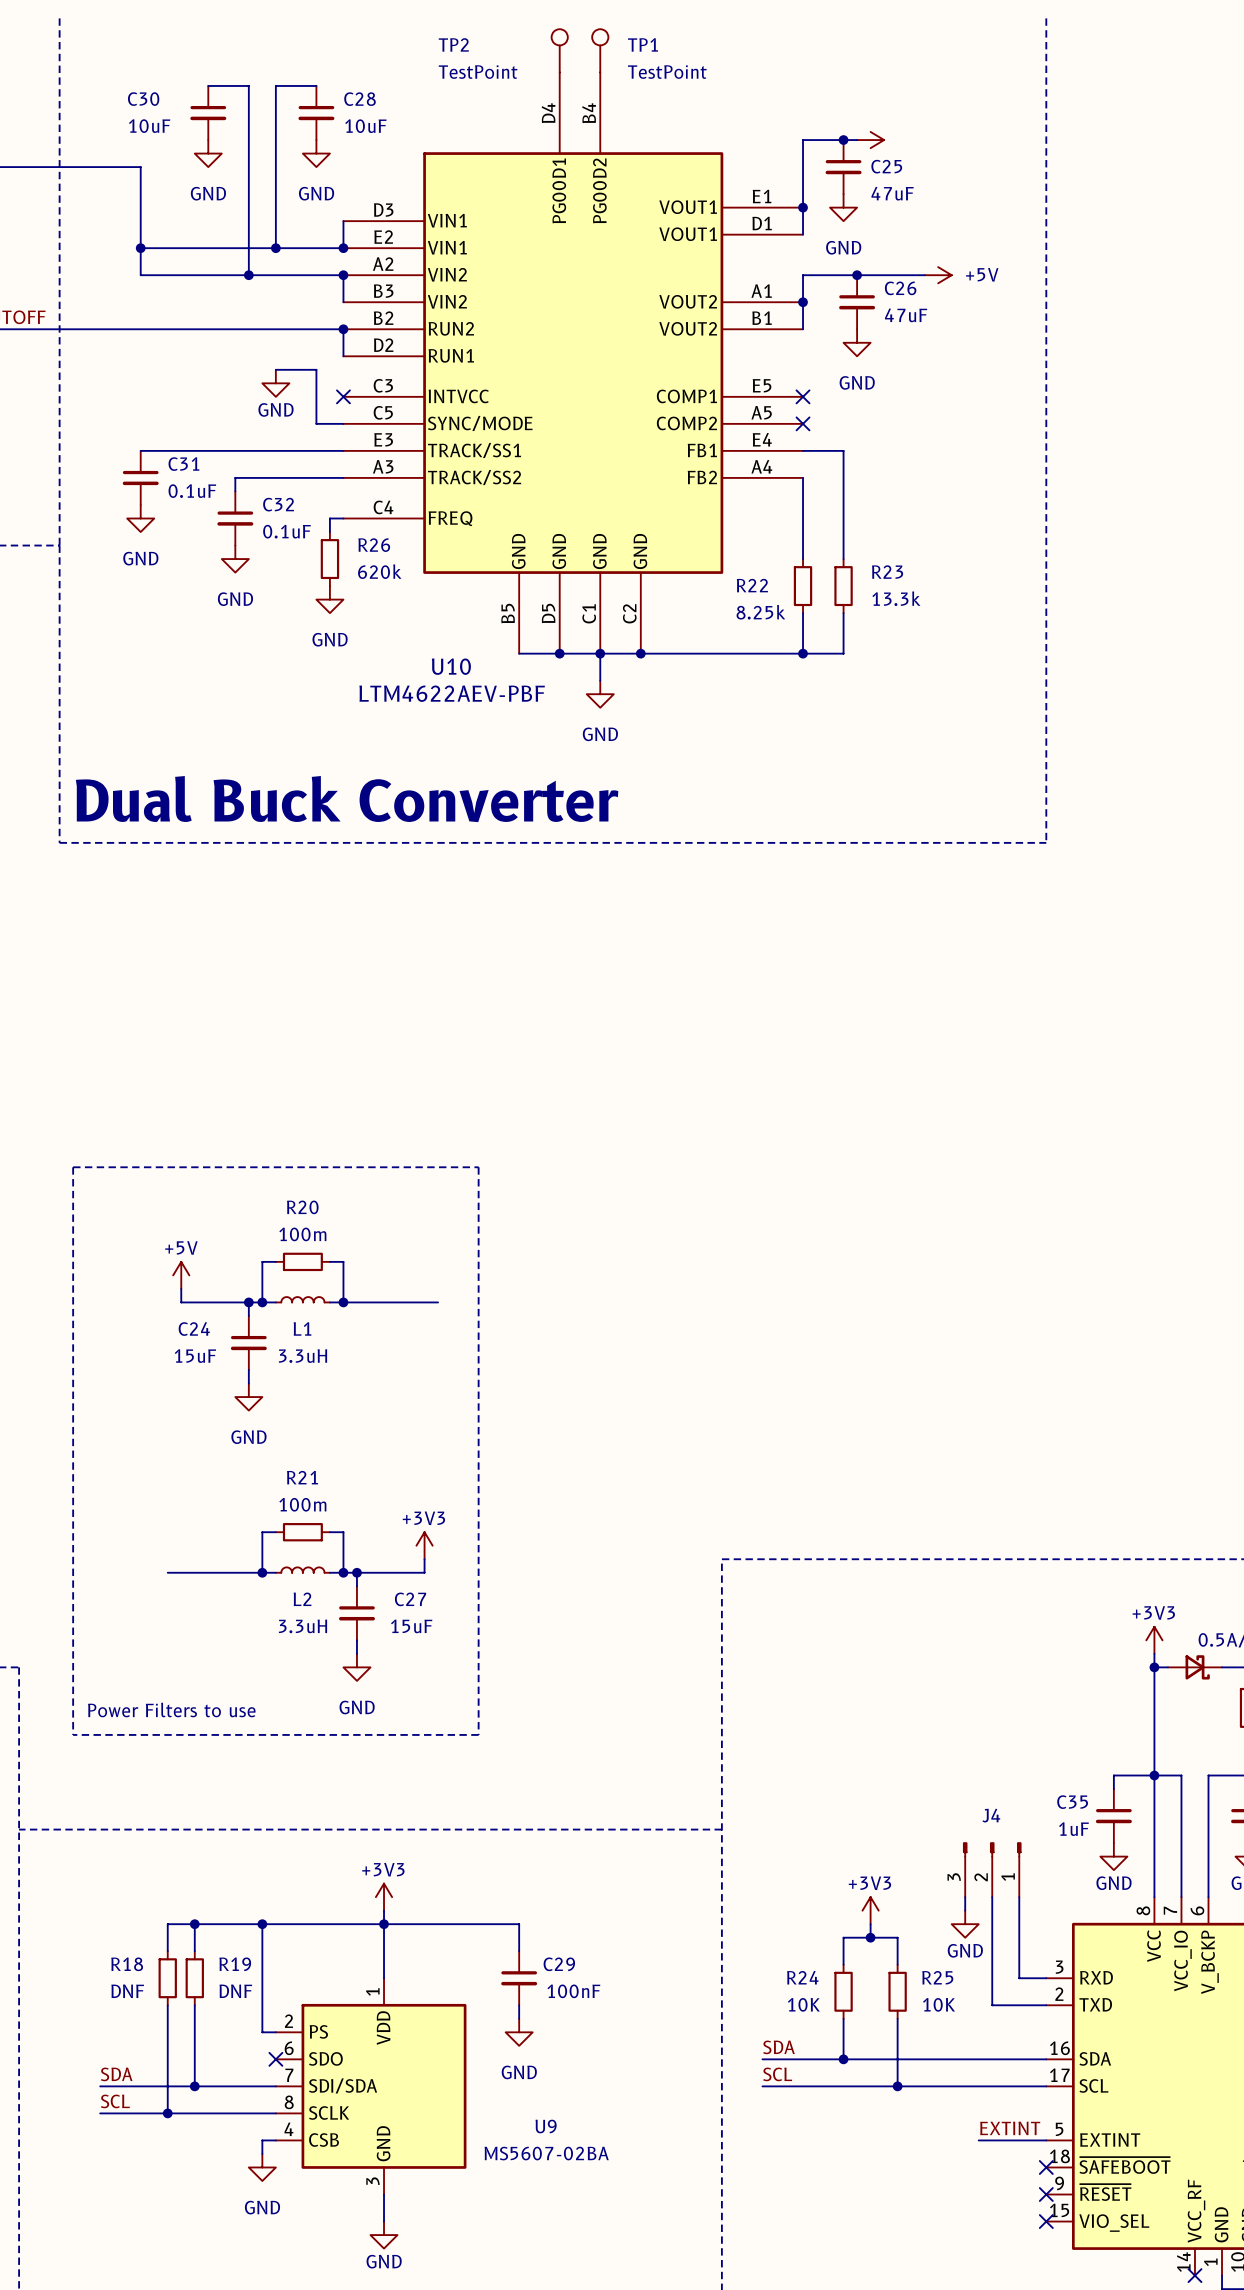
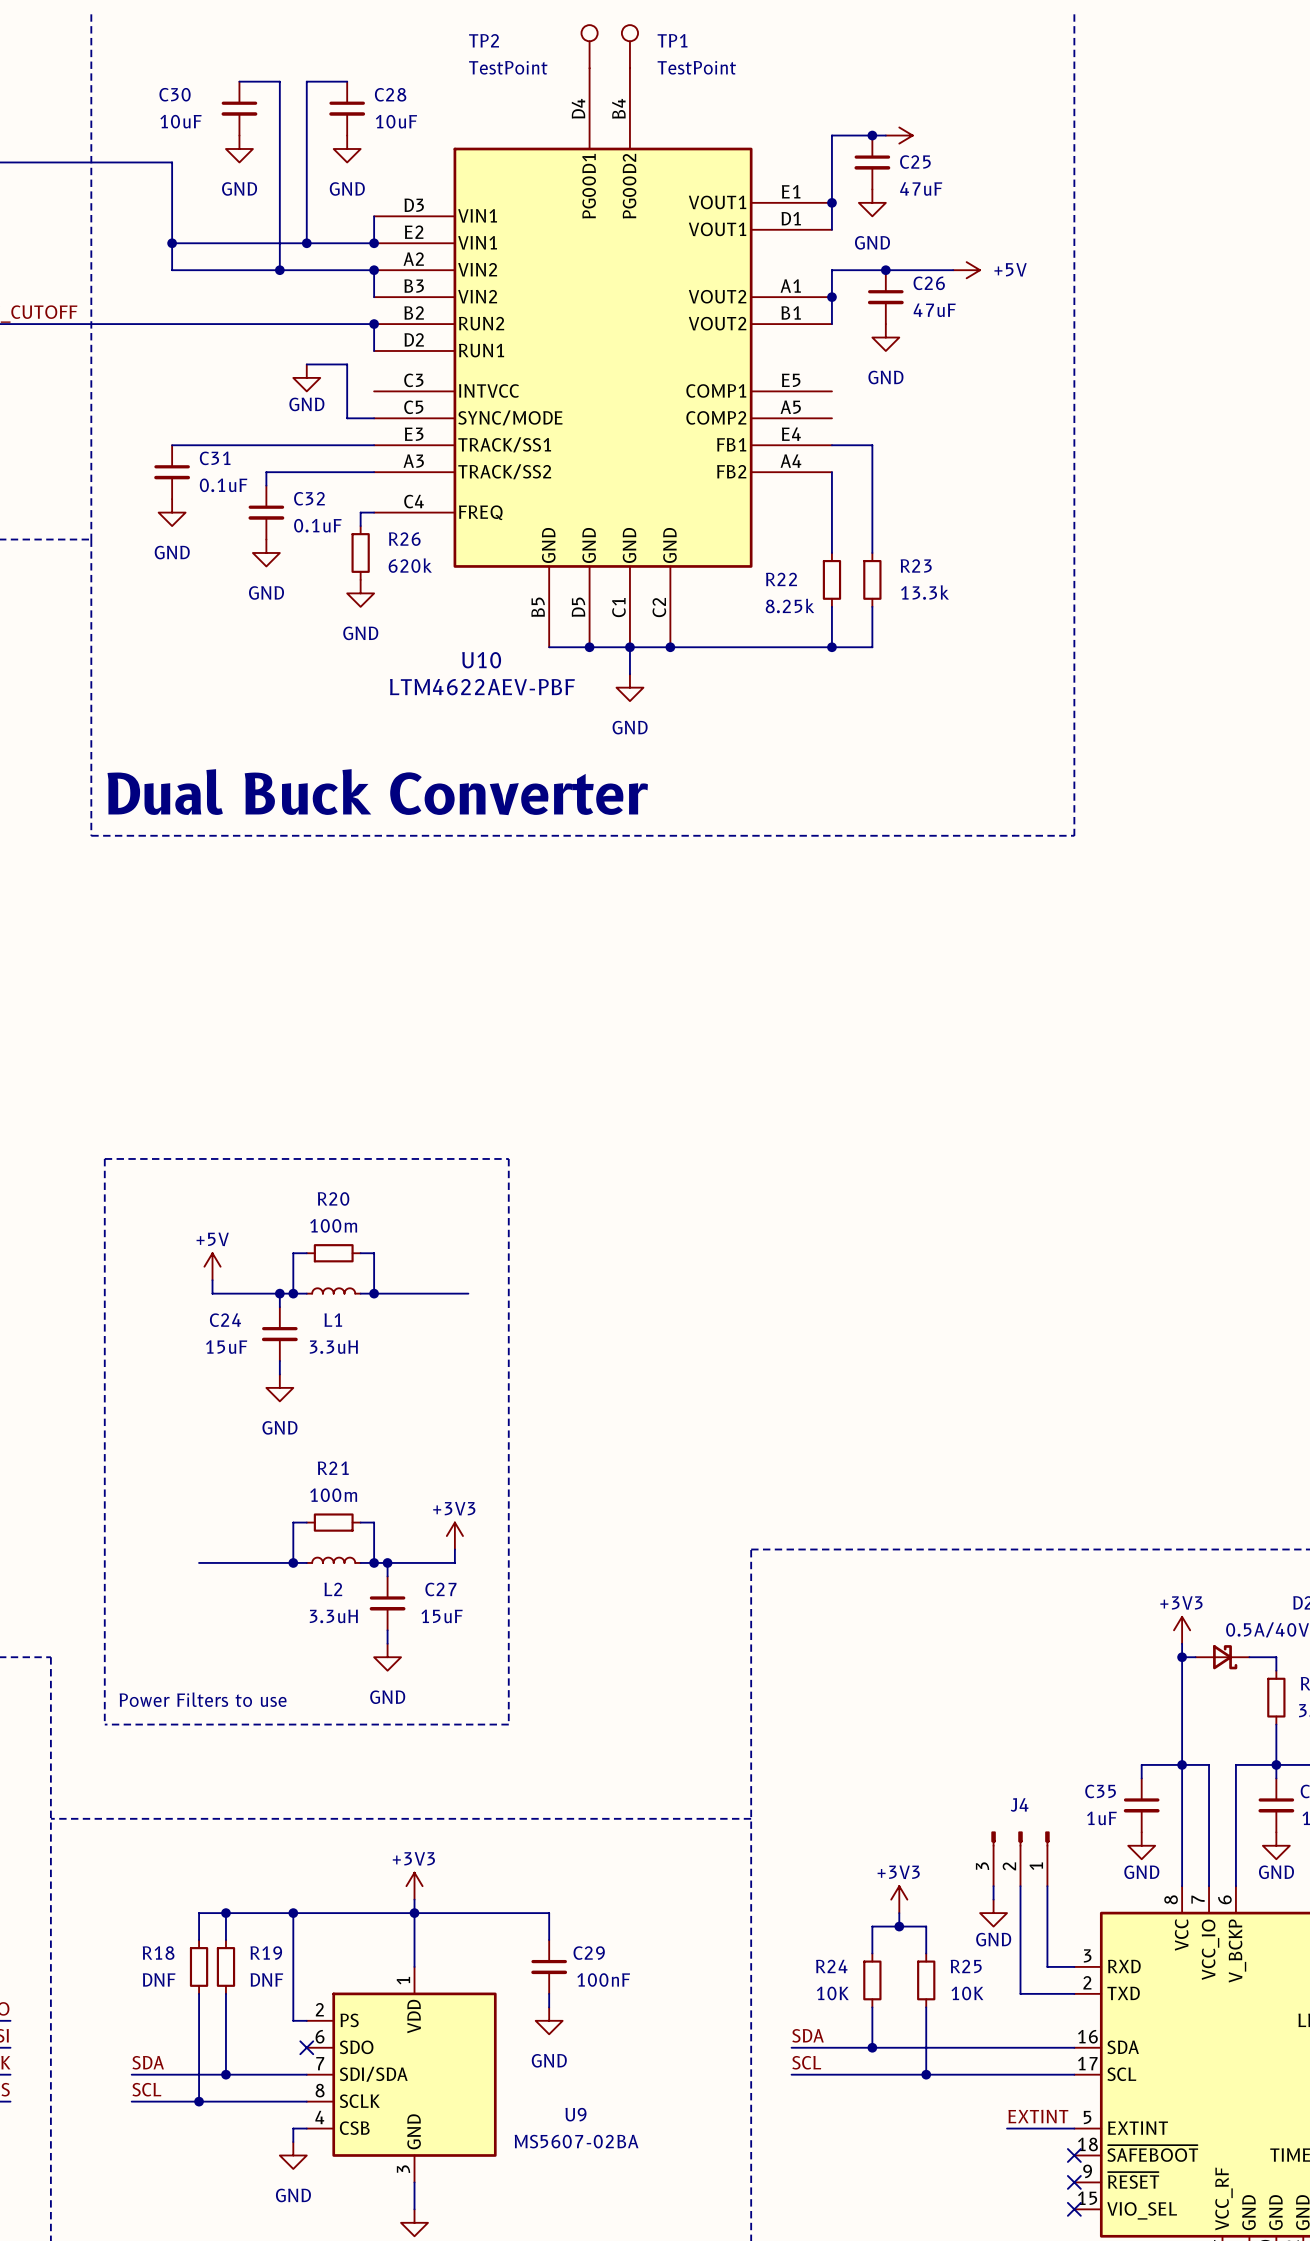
no-connect mark: (343, 396) -> none
no-connect mark: (803, 396) -> none
no-connect mark: (803, 423) -> none

